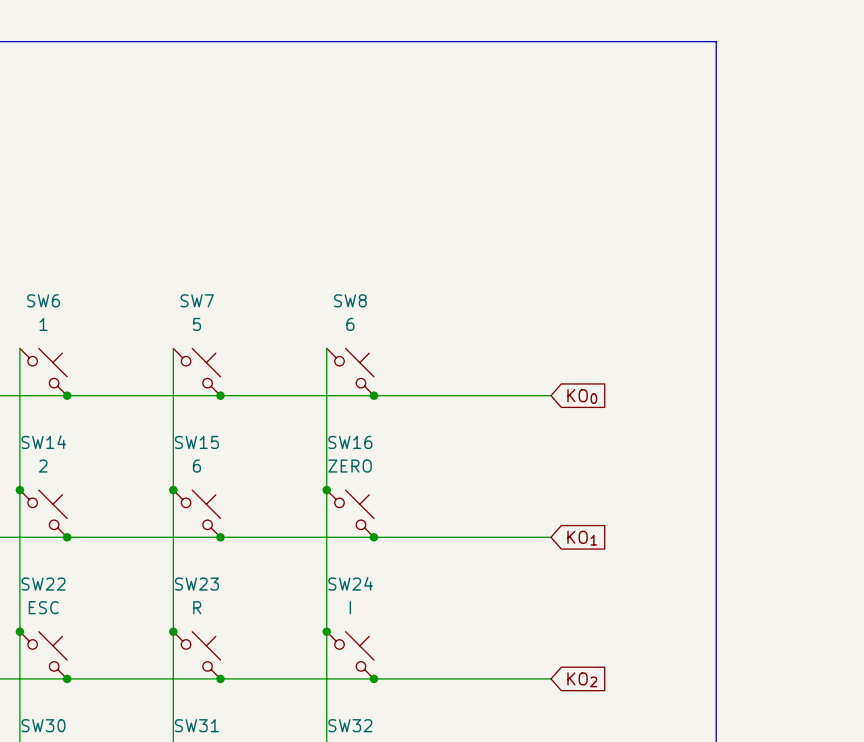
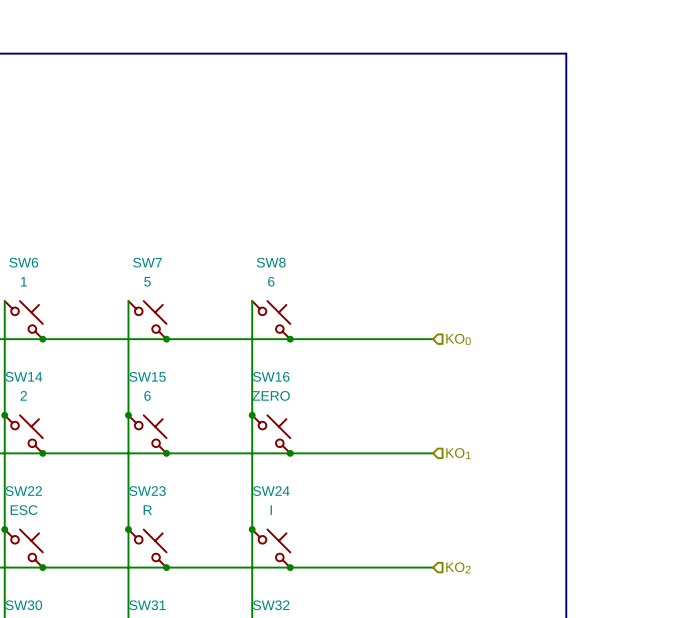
global label: KO0 (582, 396) -> none
hierarchical label: none -> KO0 (458, 339)
hierarchical label: none -> KO1 (458, 453)
global label: KO1 (582, 538) -> none
global label: KO2 (582, 679) -> none
hierarchical label: none -> KO2 (458, 567)

